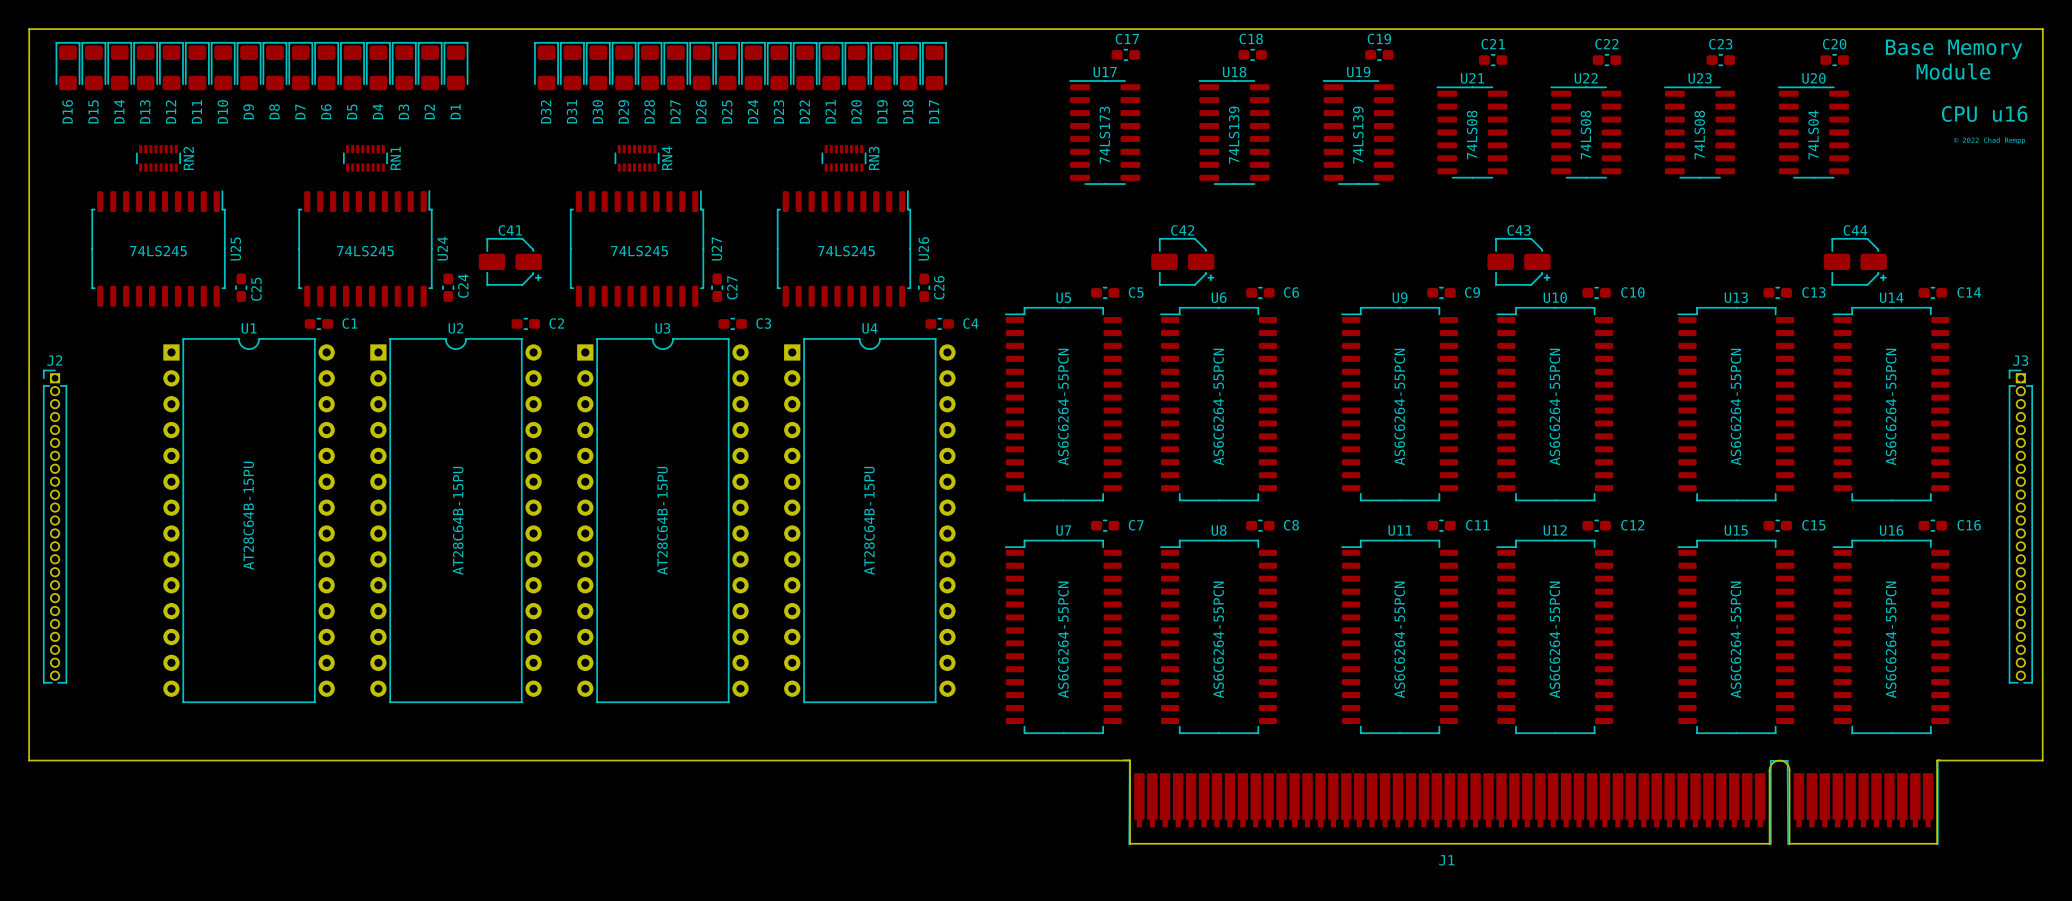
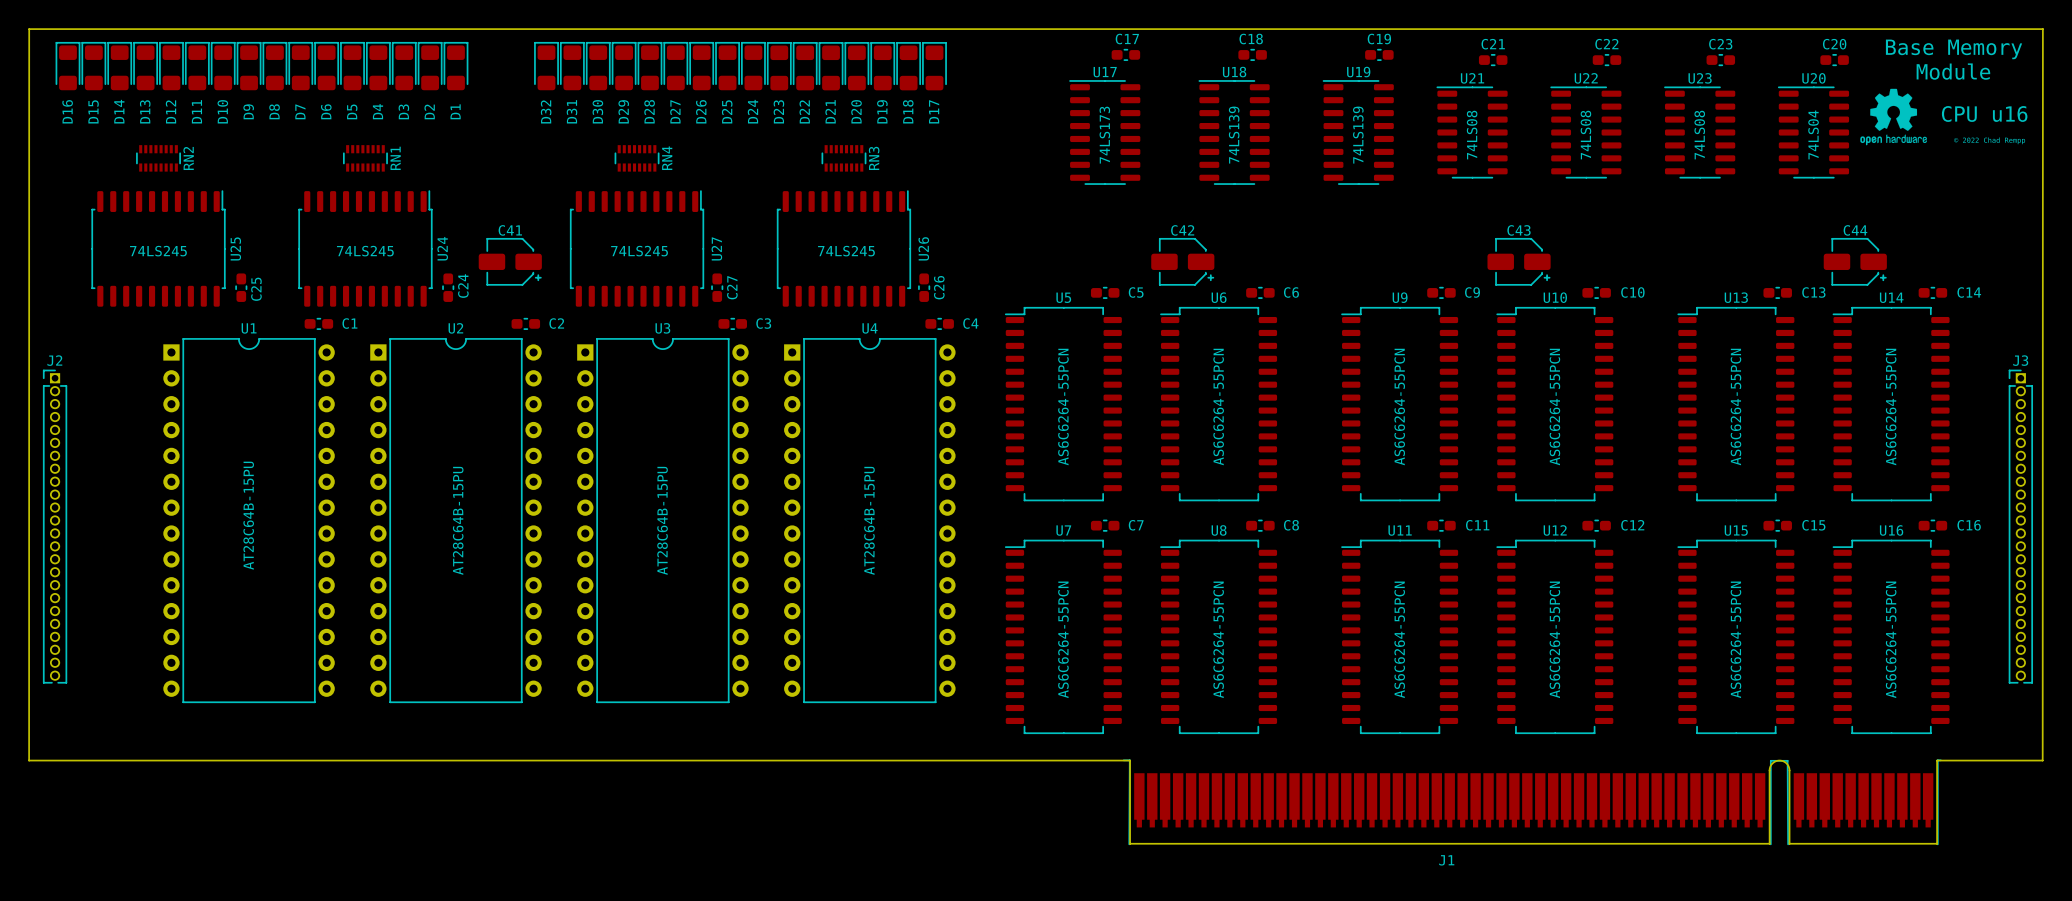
drawing: none -> [1860, 88, 1927, 146]

